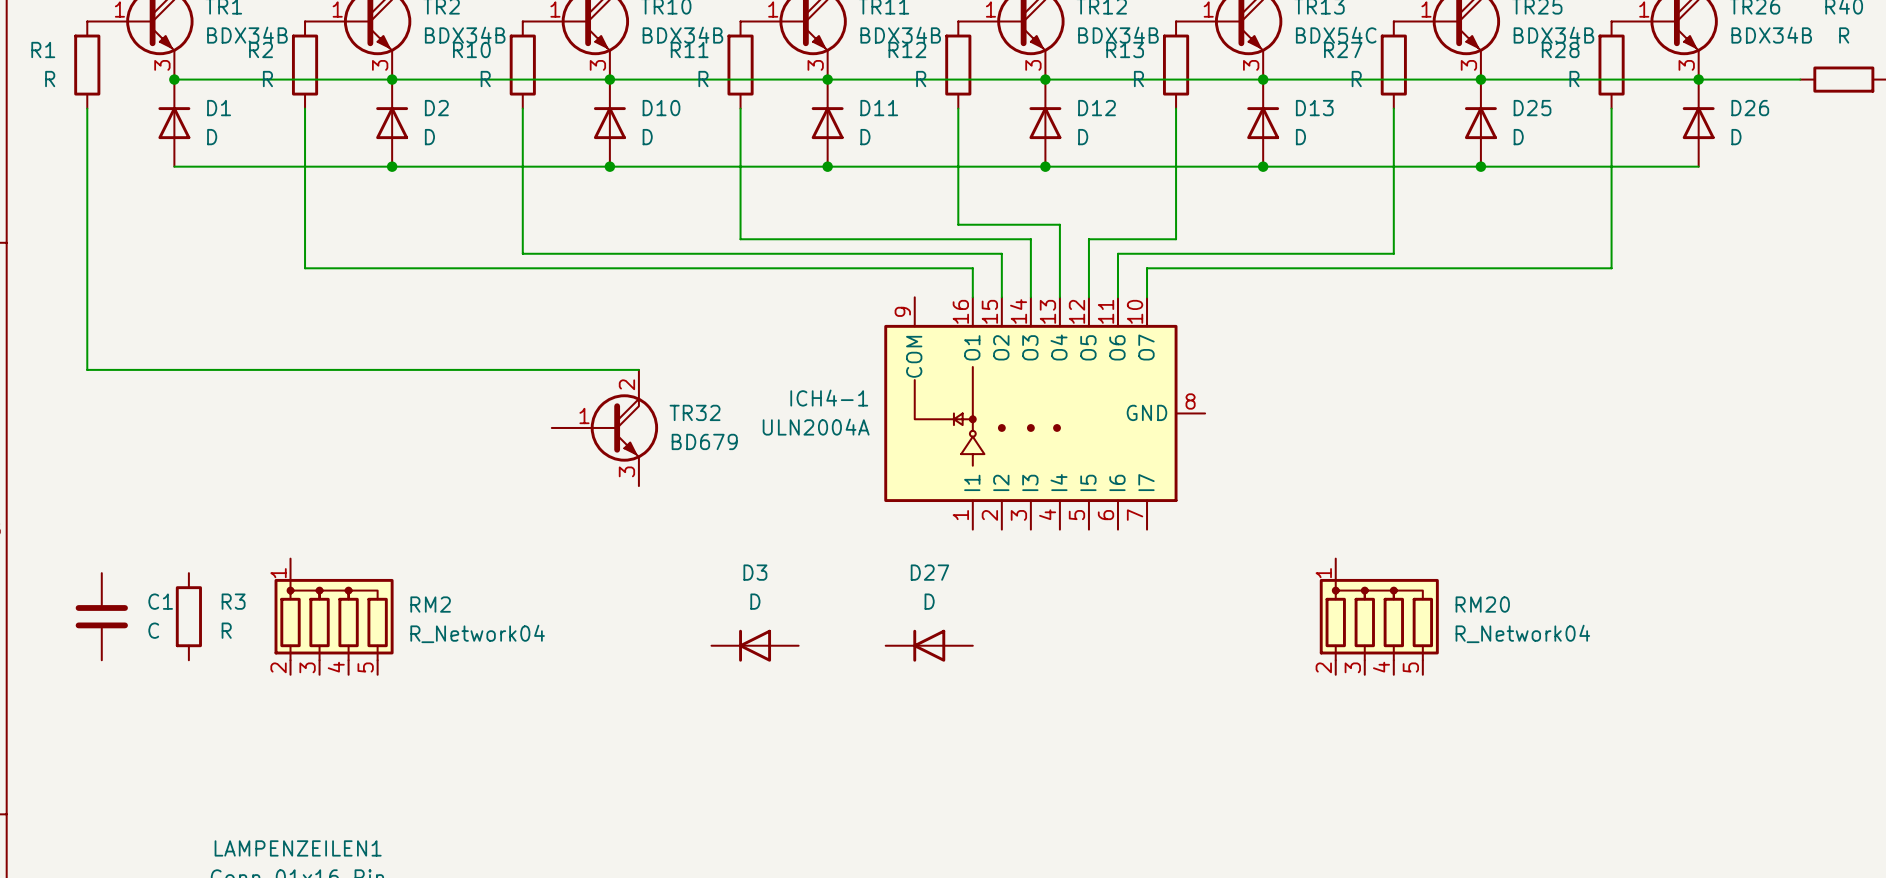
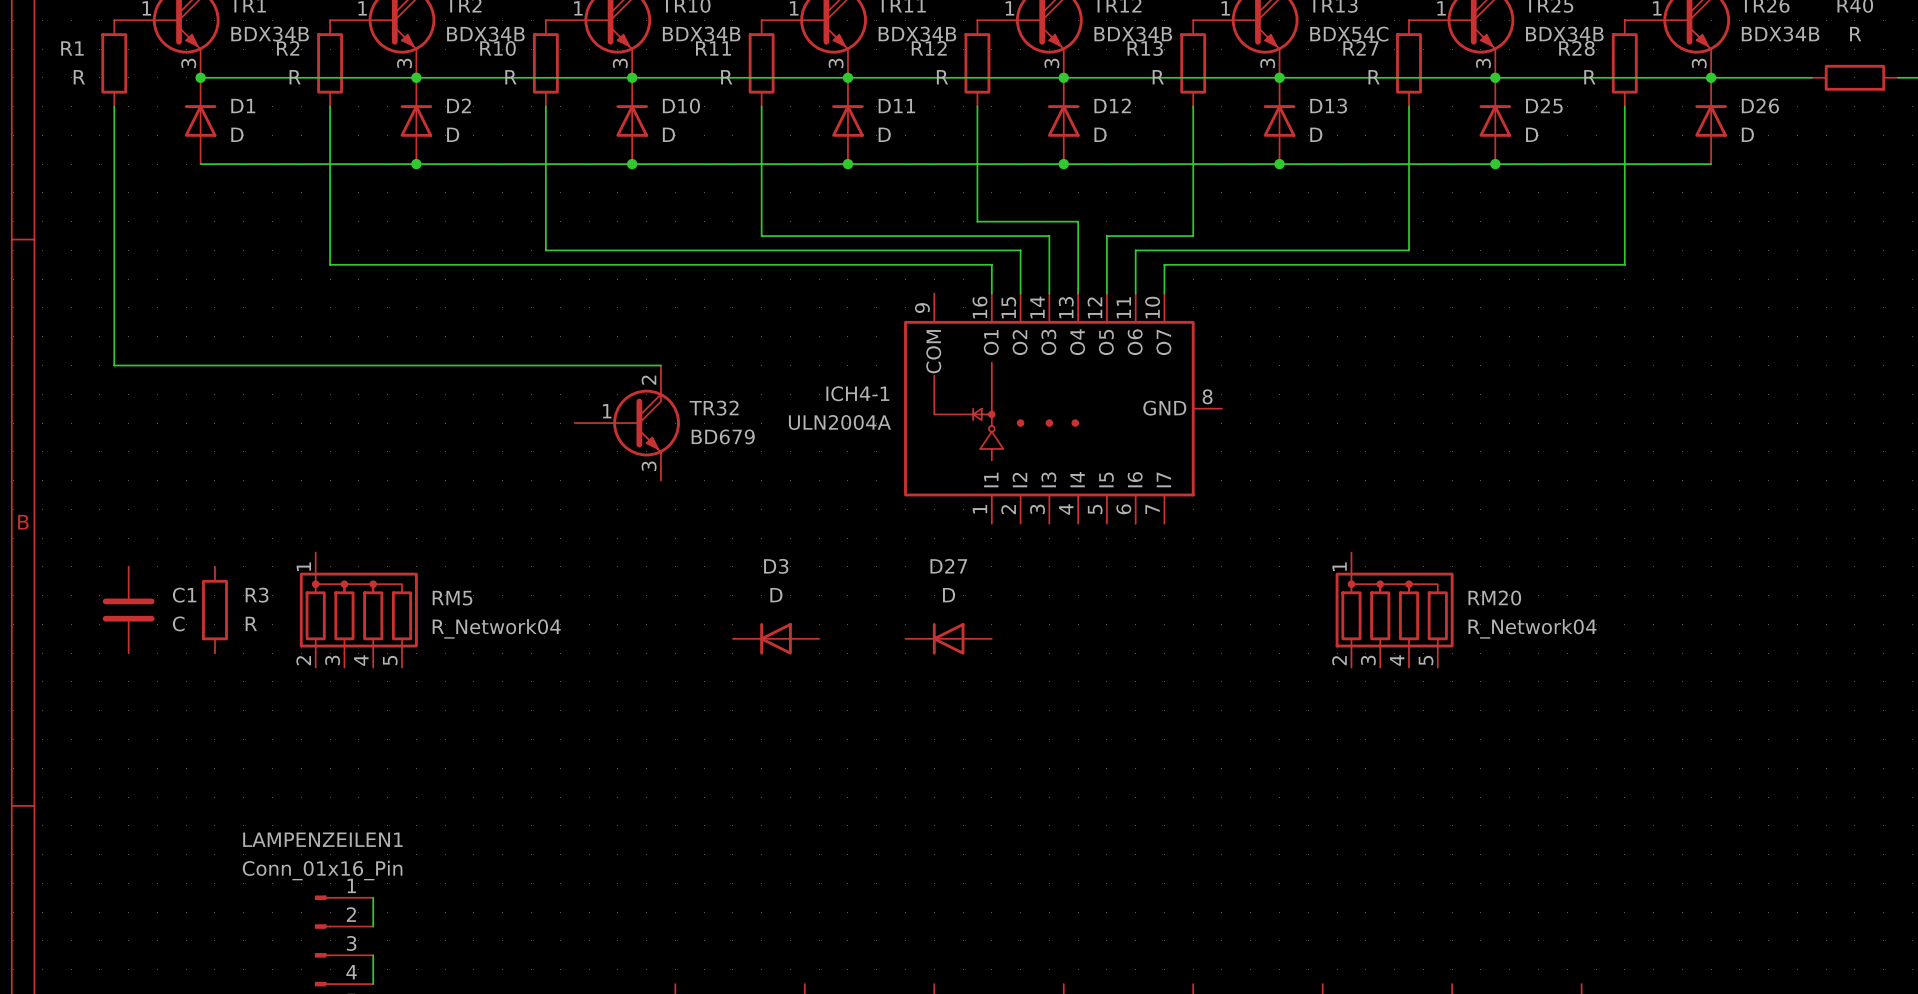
RM2 name: RM2 (430, 604) -> RM5 (452, 598)

